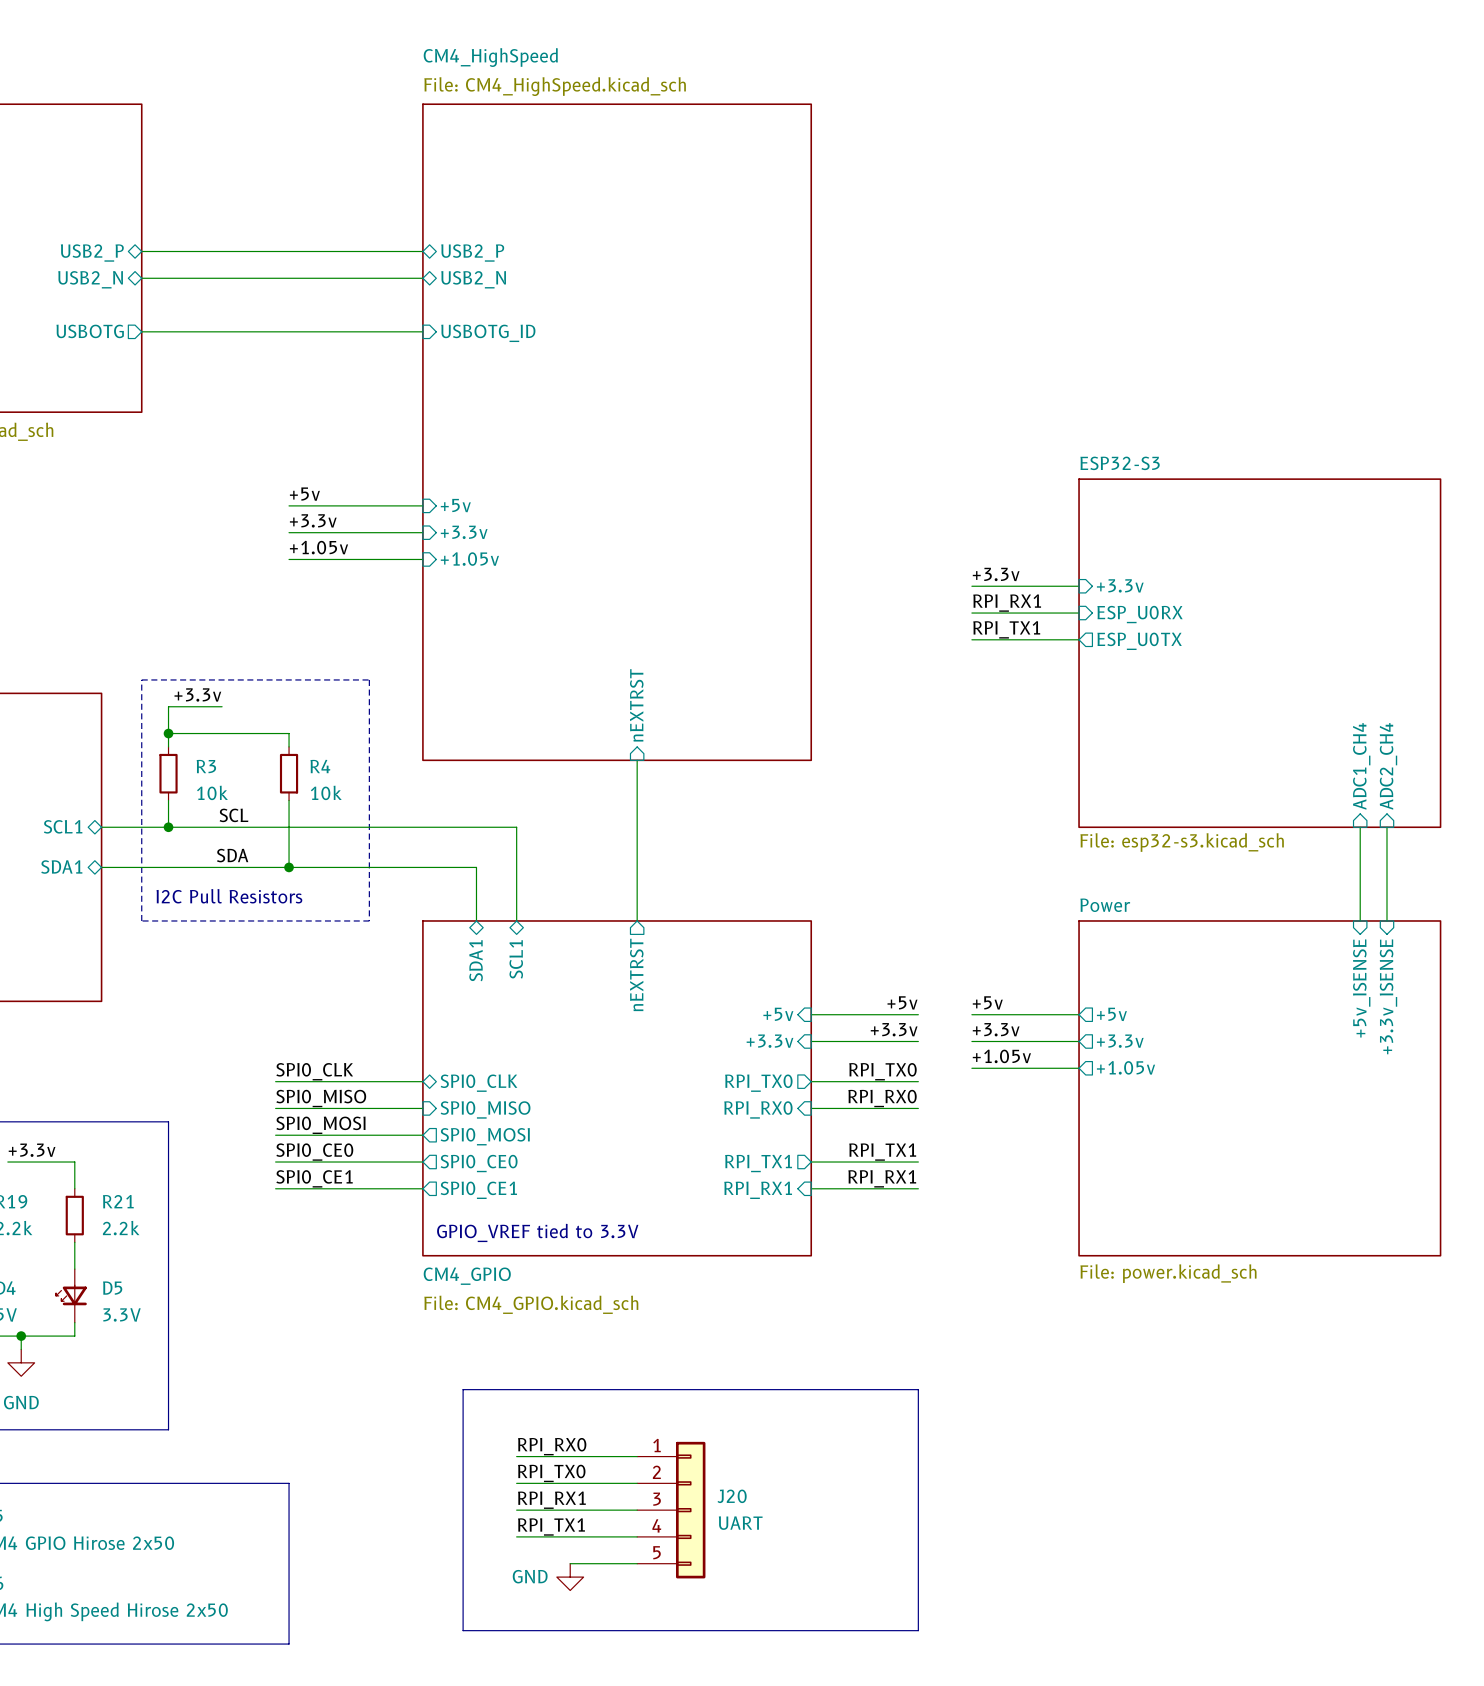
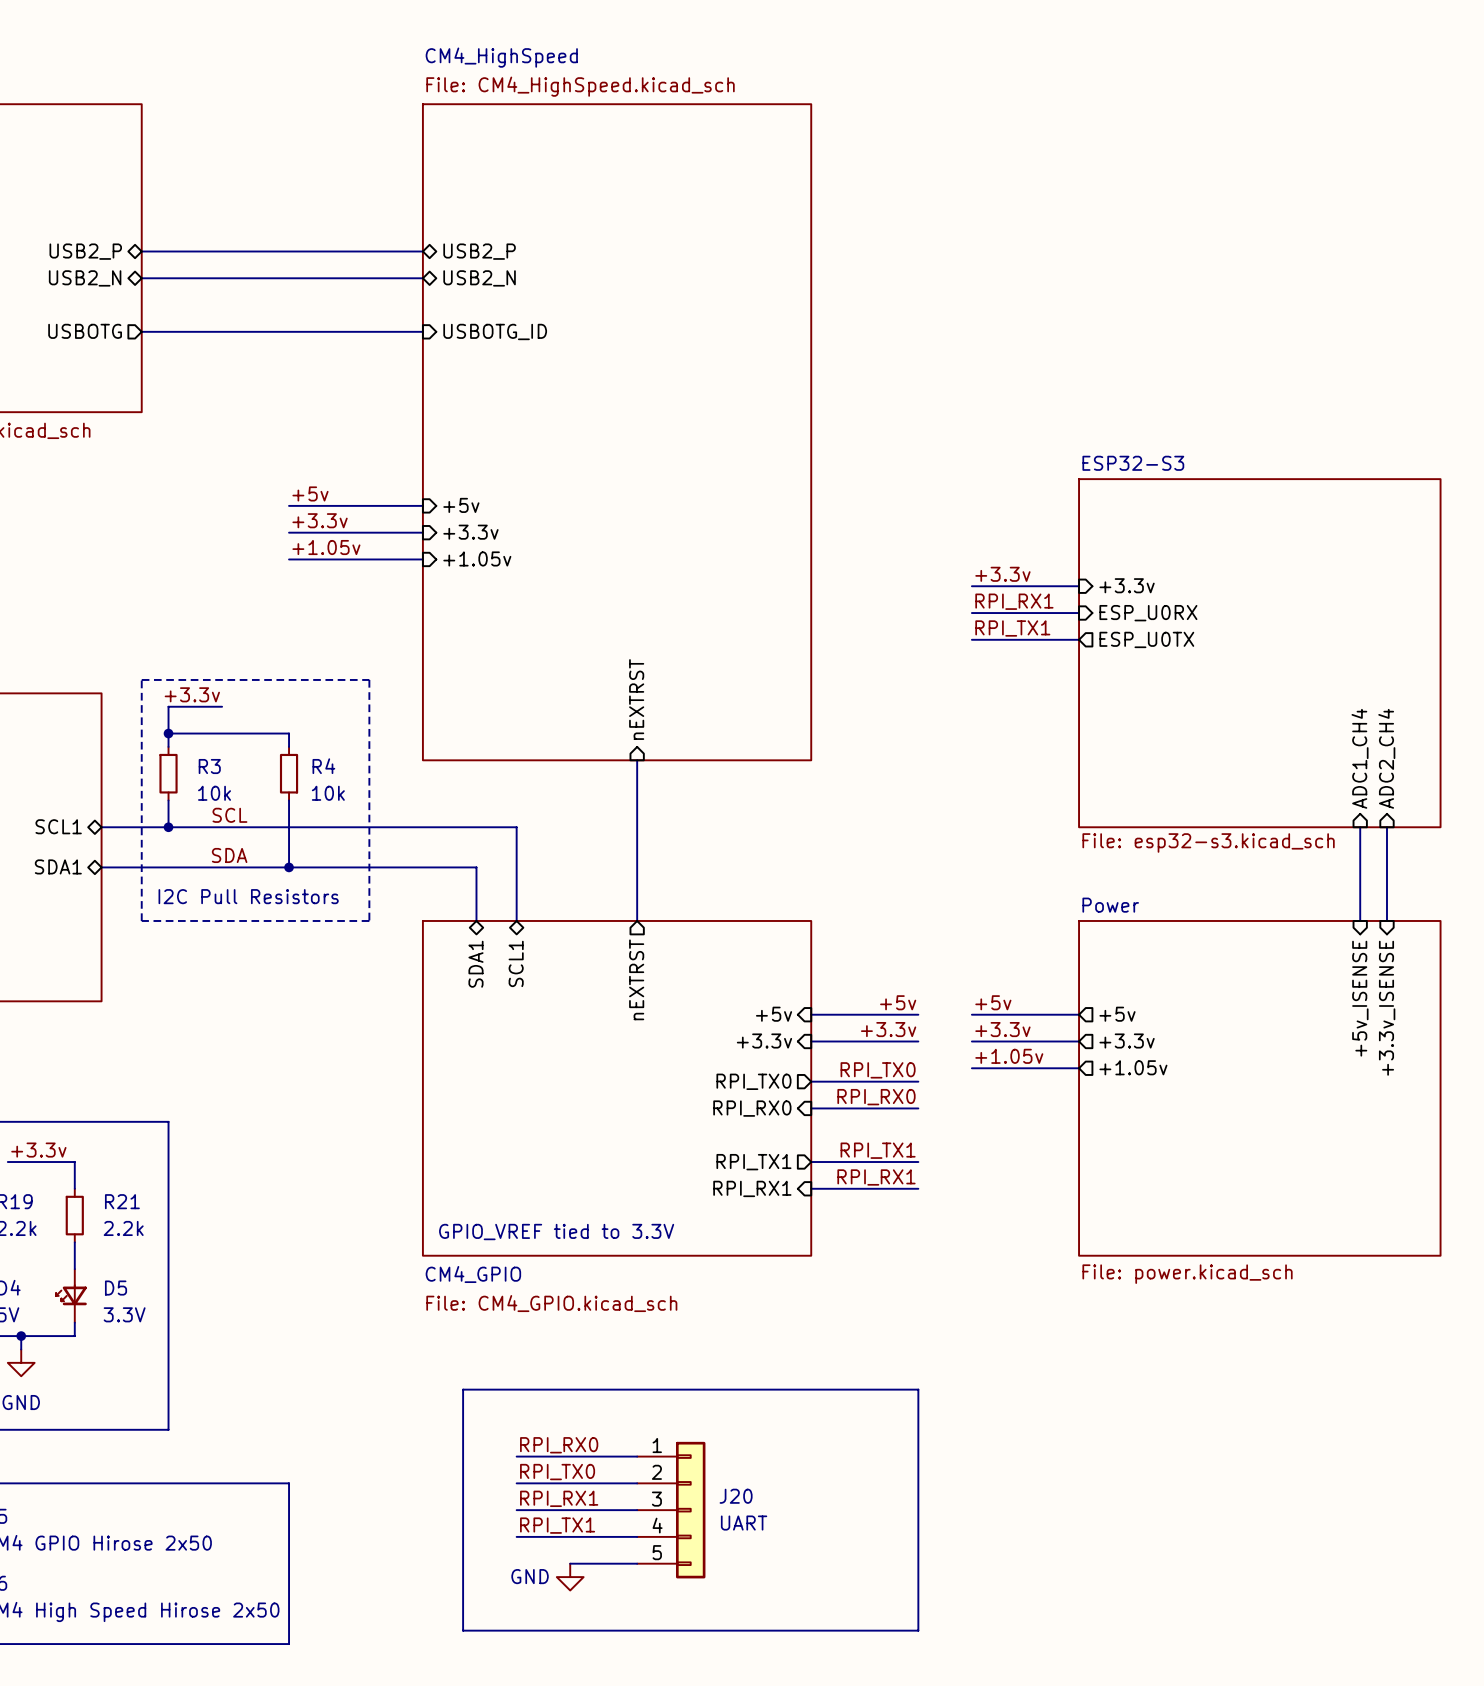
label: SPI0_CLK (314, 1071) -> none
wire: (275, 1081) (422, 1081) -> none
sheet pin: SPI0_CLK (479, 1083) -> none
label: SPI0_MISO (321, 1098) -> none
wire: (275, 1108) (422, 1108) -> none
sheet pin: SPI0_MISO (485, 1109) -> none
label: SPI0_MOSI (320, 1125) -> none
wire: (275, 1135) (422, 1135) -> none
sheet pin: SPI0_MOSI (485, 1136) -> none
label: SPI0_CE0 (314, 1152) -> none
wire: (275, 1162) (422, 1162) -> none
sheet pin: SPI0_CE0 (479, 1163) -> none
label: SPI0_CE1 (314, 1178) -> none
wire: (275, 1188) (422, 1188) -> none
sheet pin: SPI0_CE1 (478, 1190) -> none

